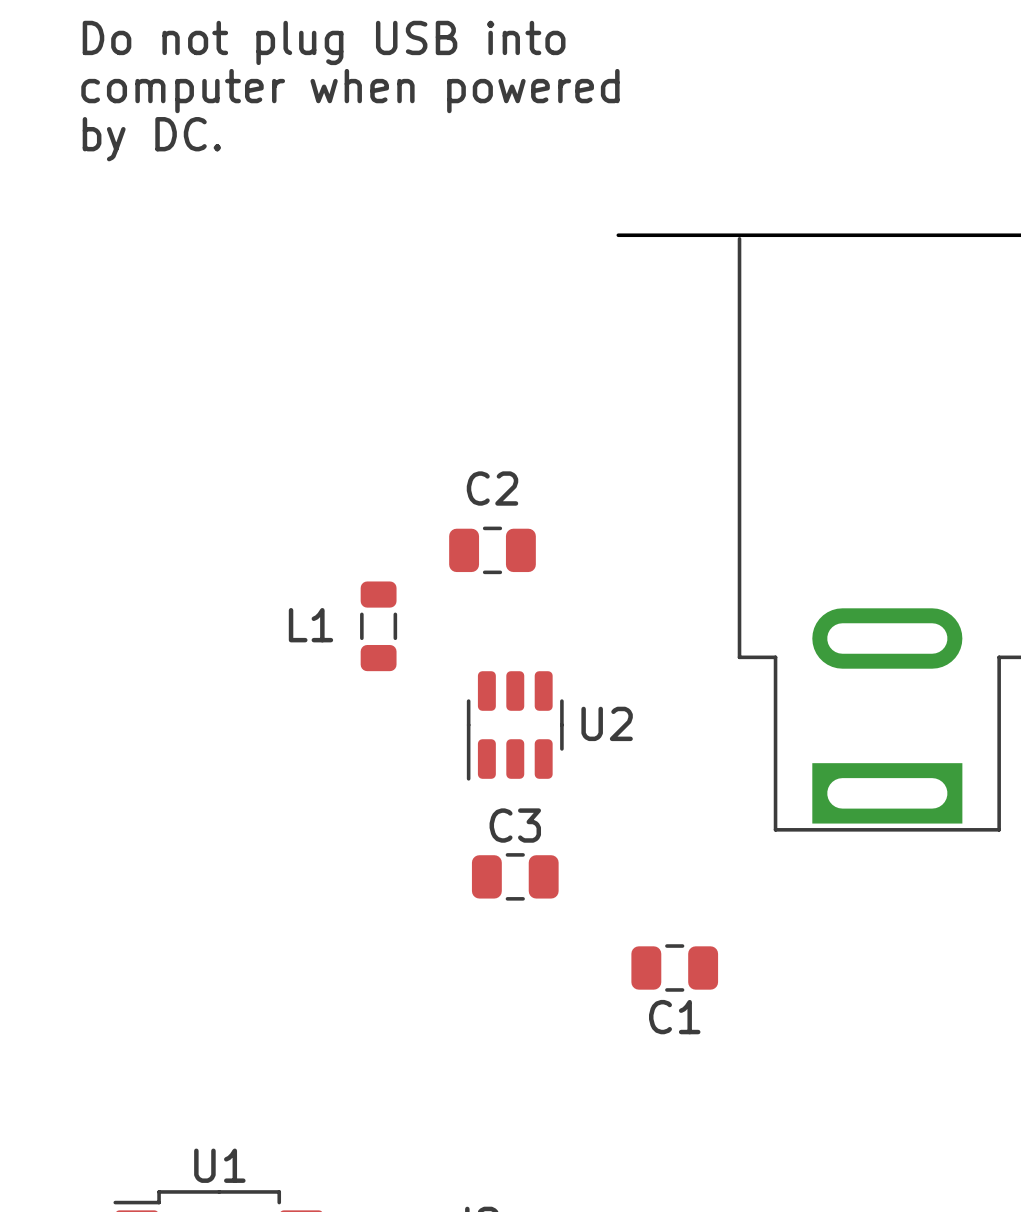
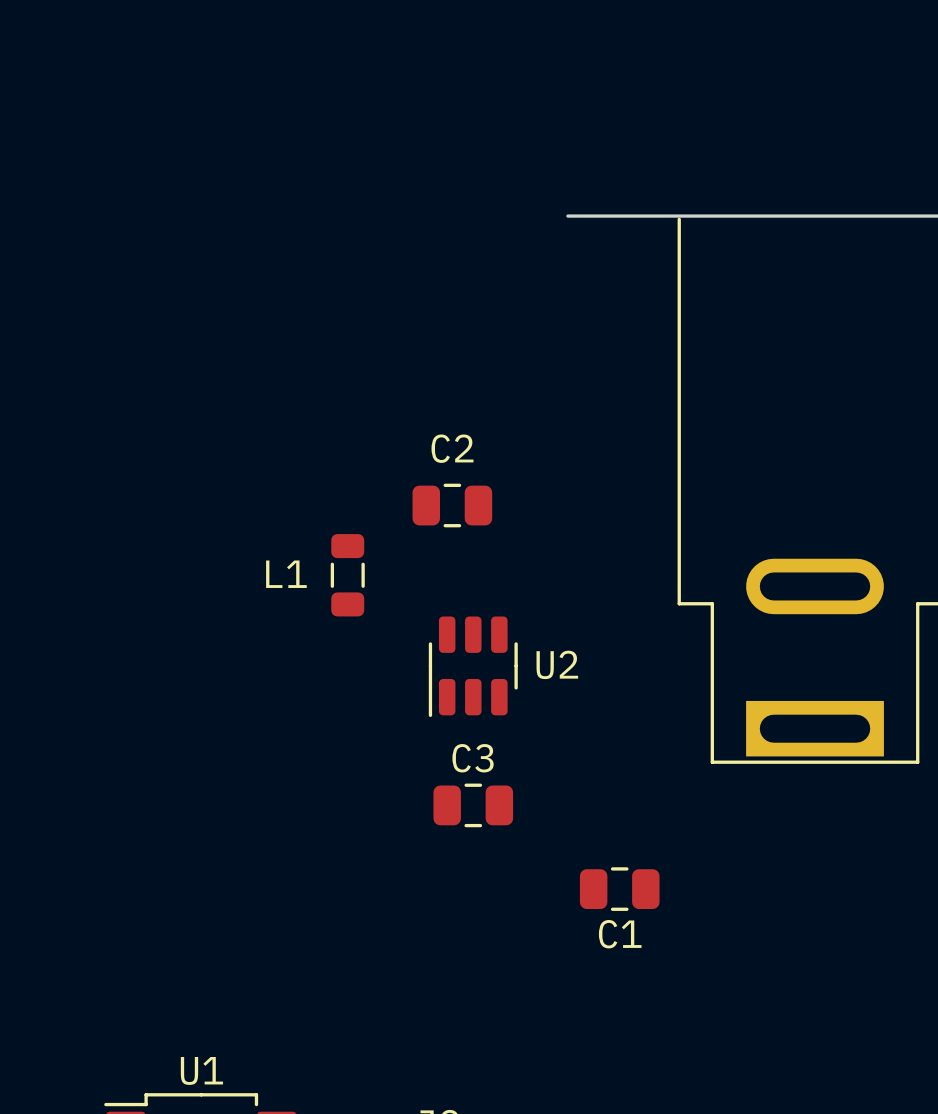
text: Do not plug USB into (324, 42) -> none
text: computer when powered (350, 91) -> none
text: by DC. (151, 139) -> none

